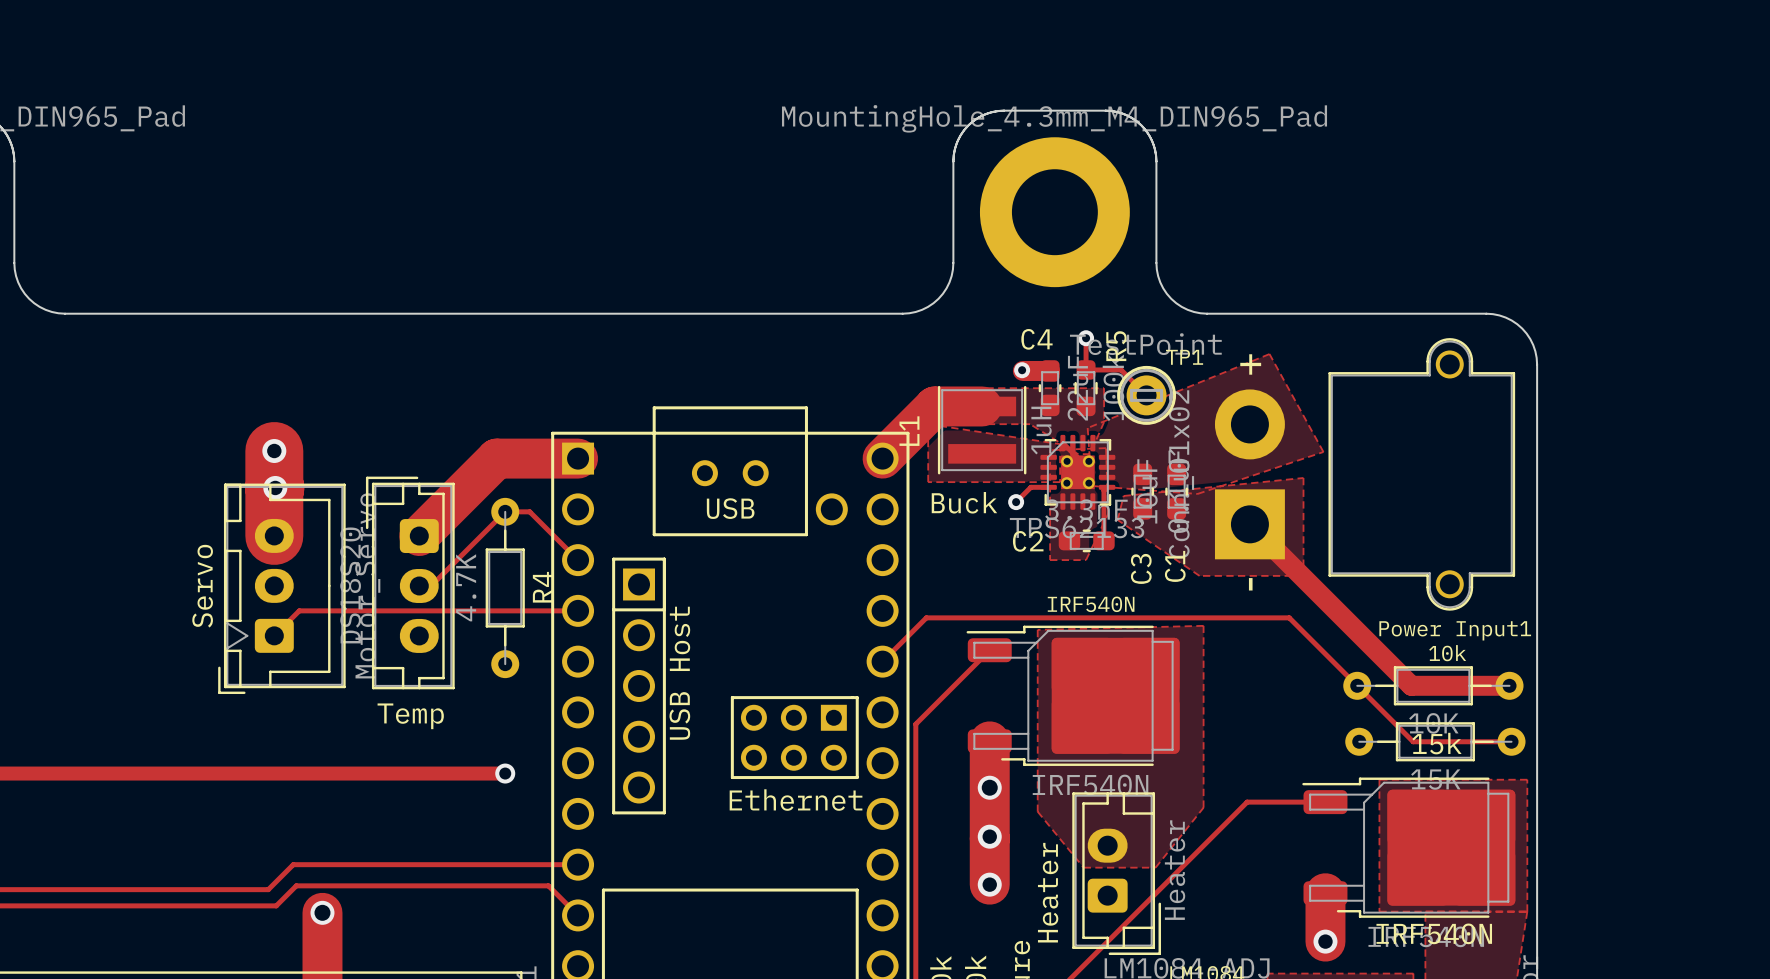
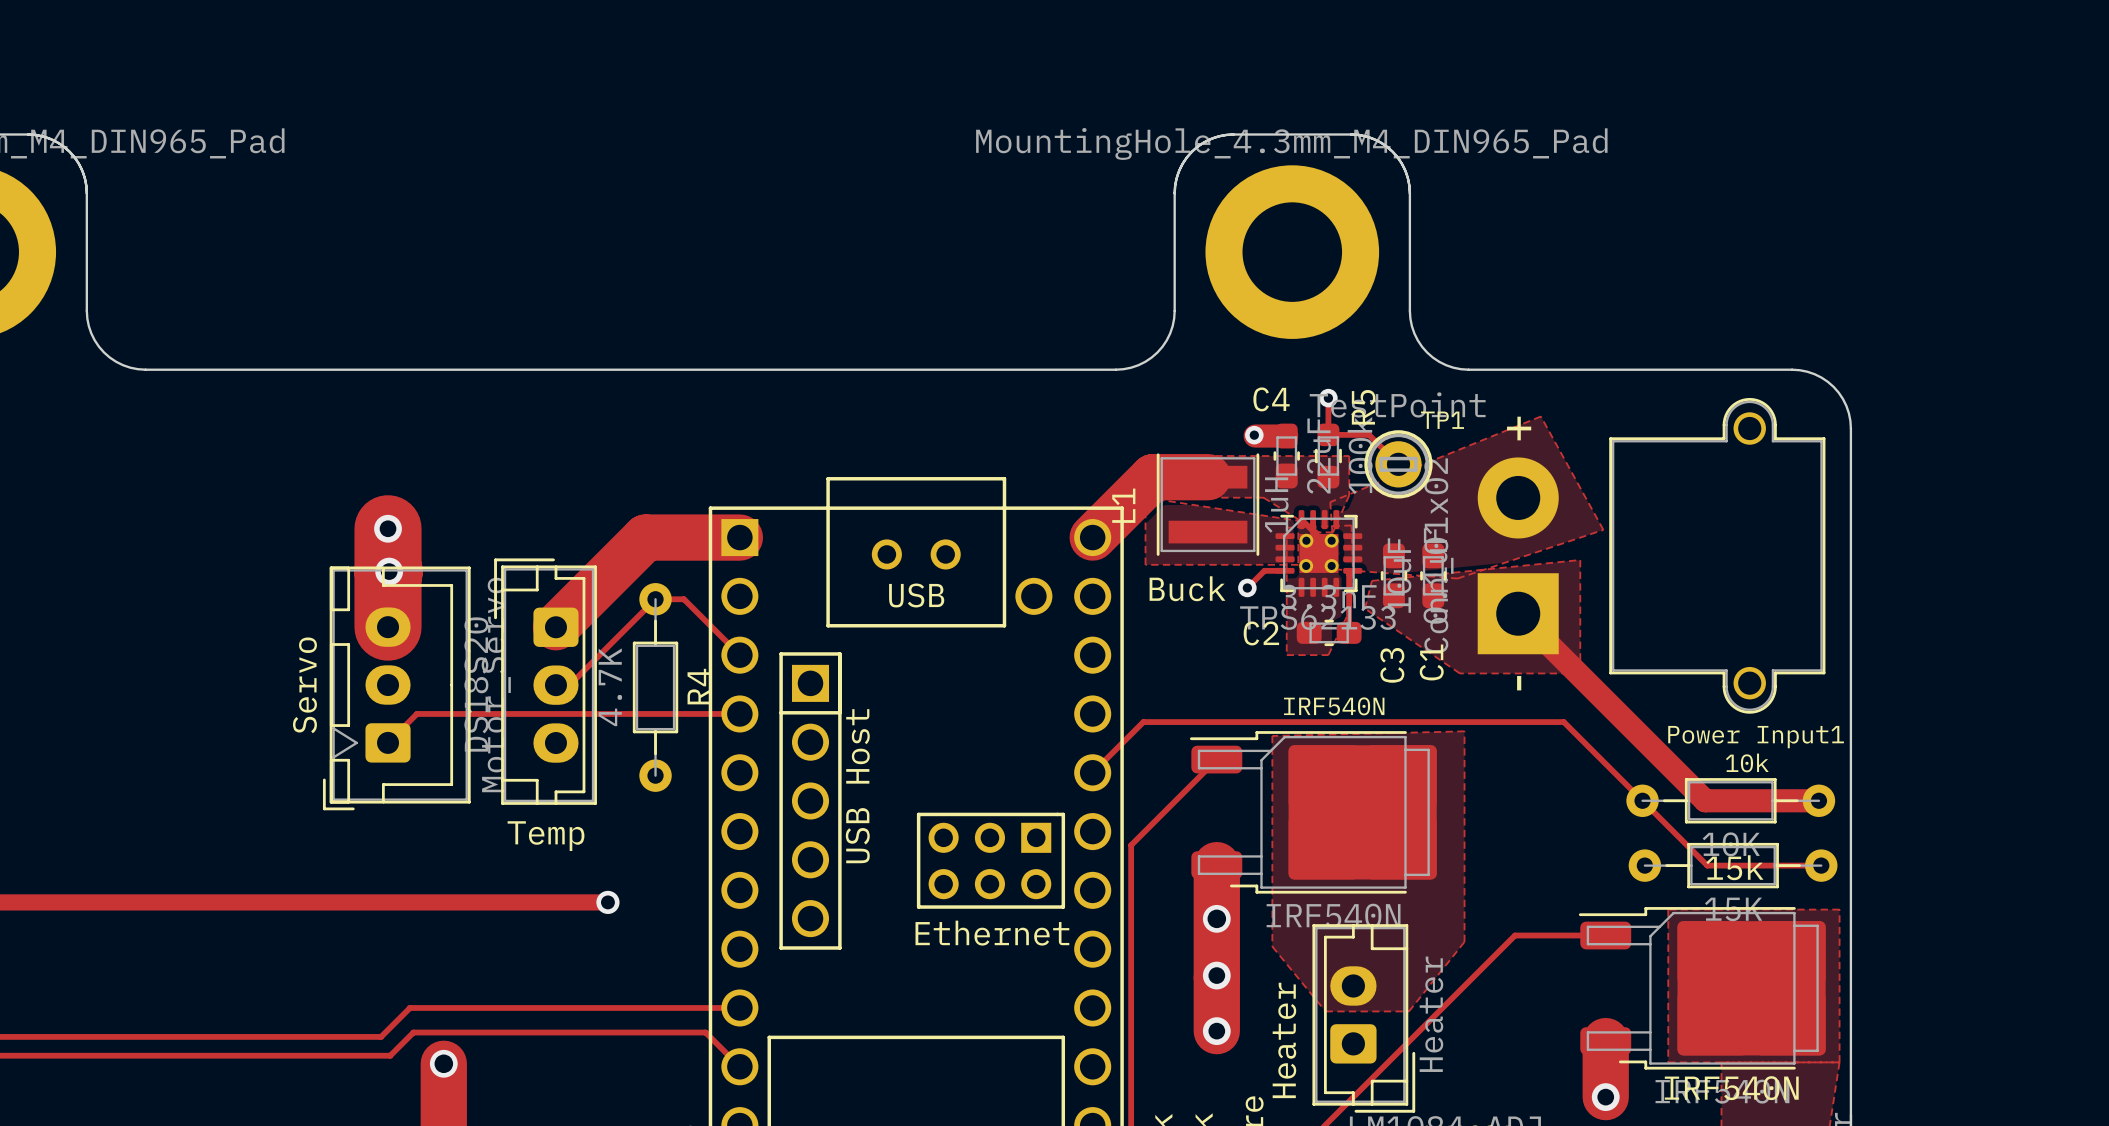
track: (464, 773) (505, 773) -> none
via position: (505, 773) -> (607, 902)

